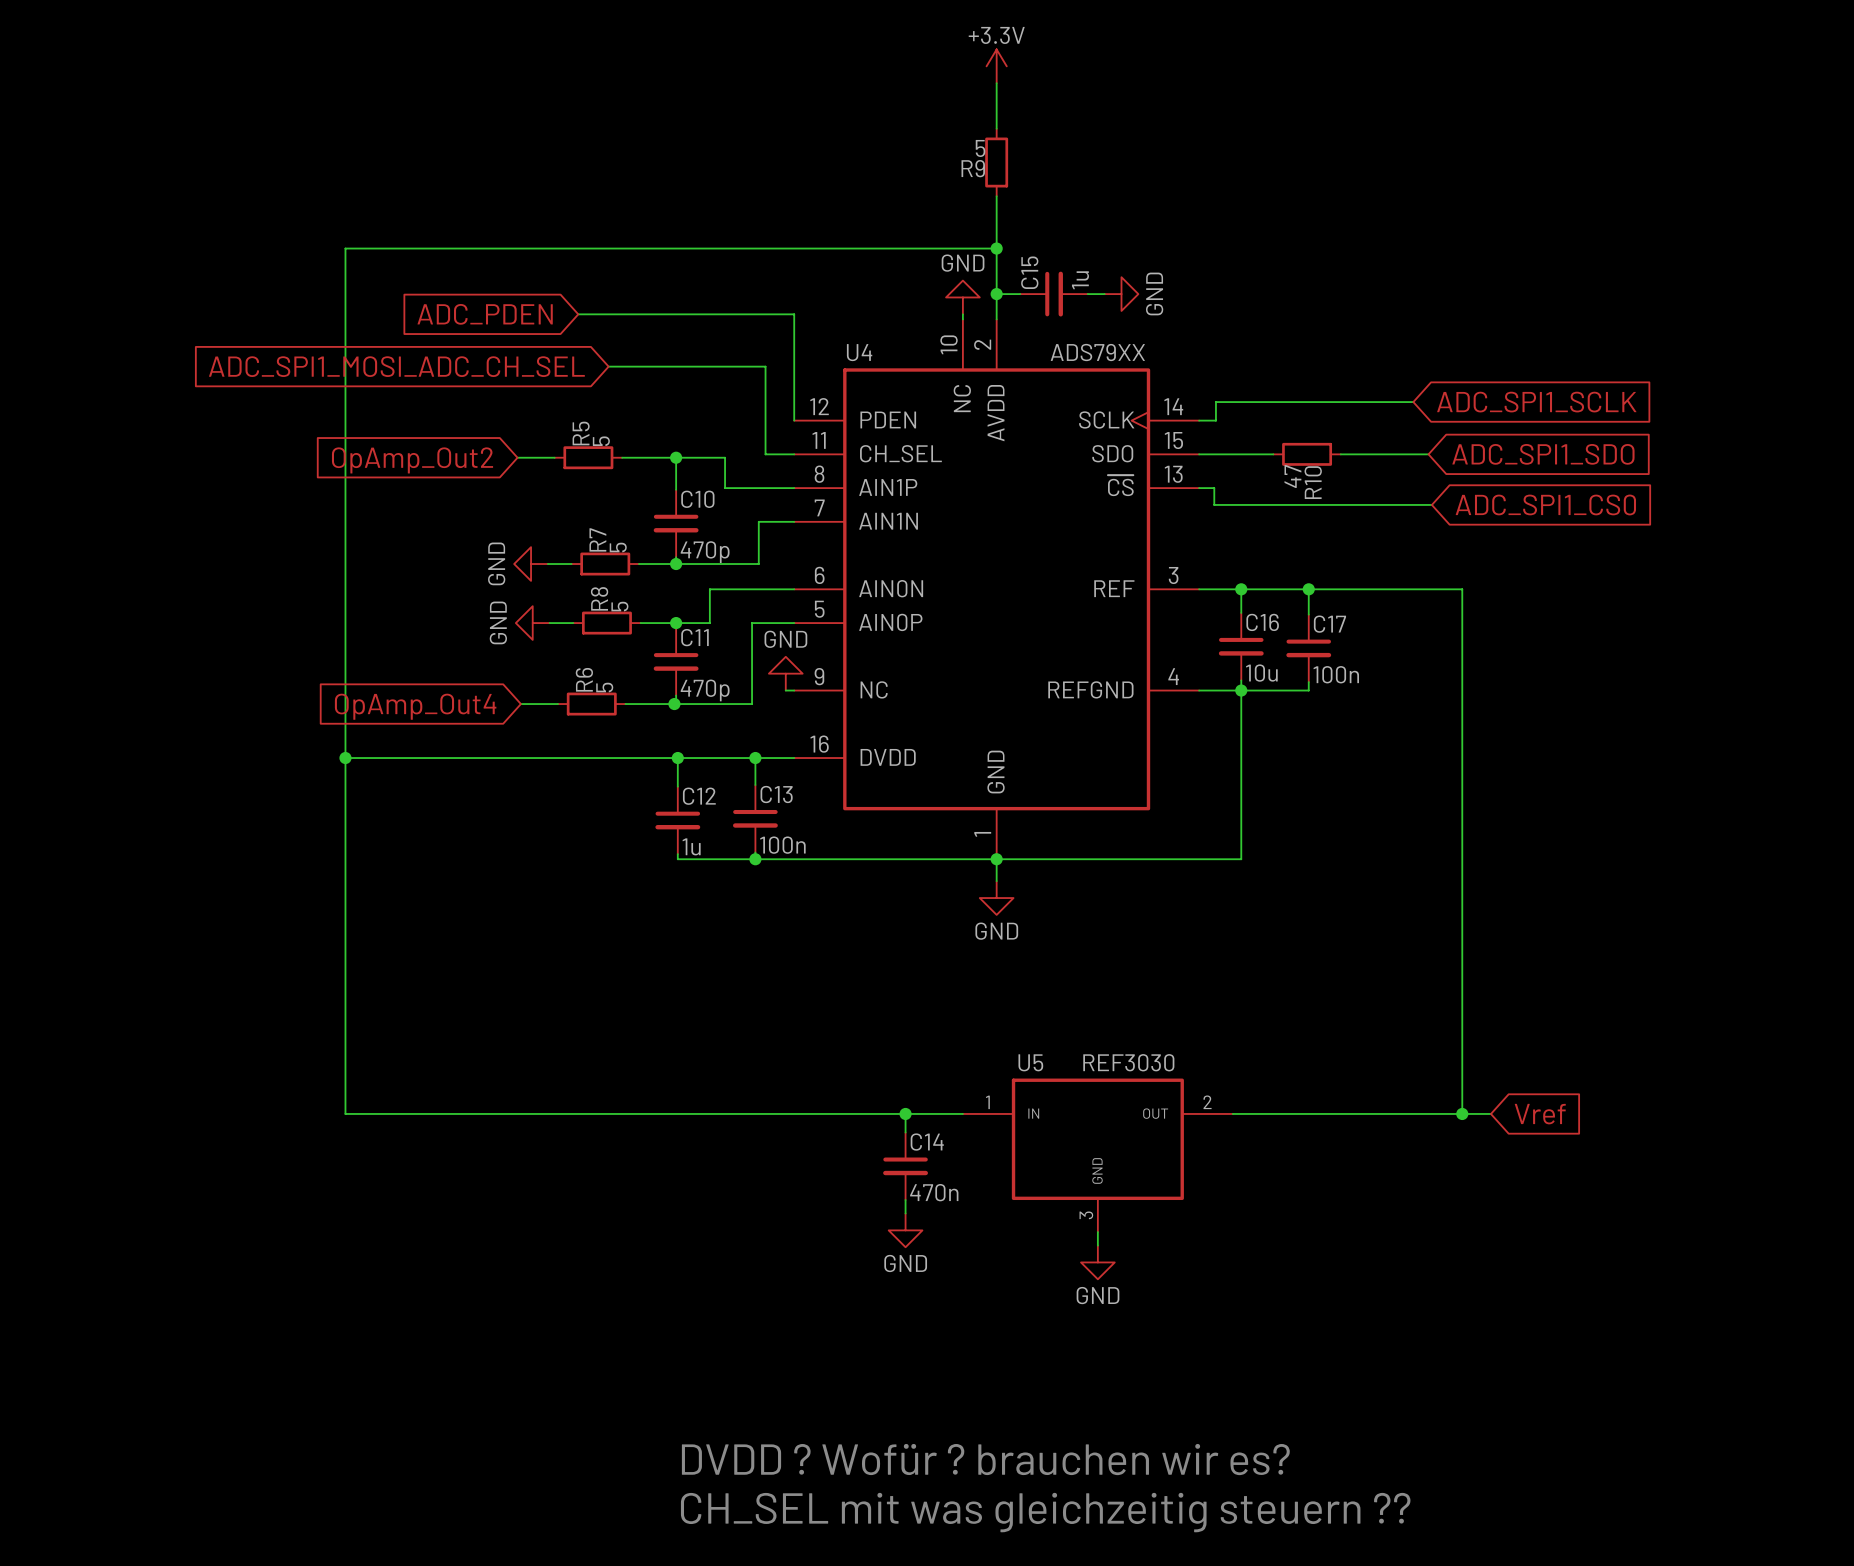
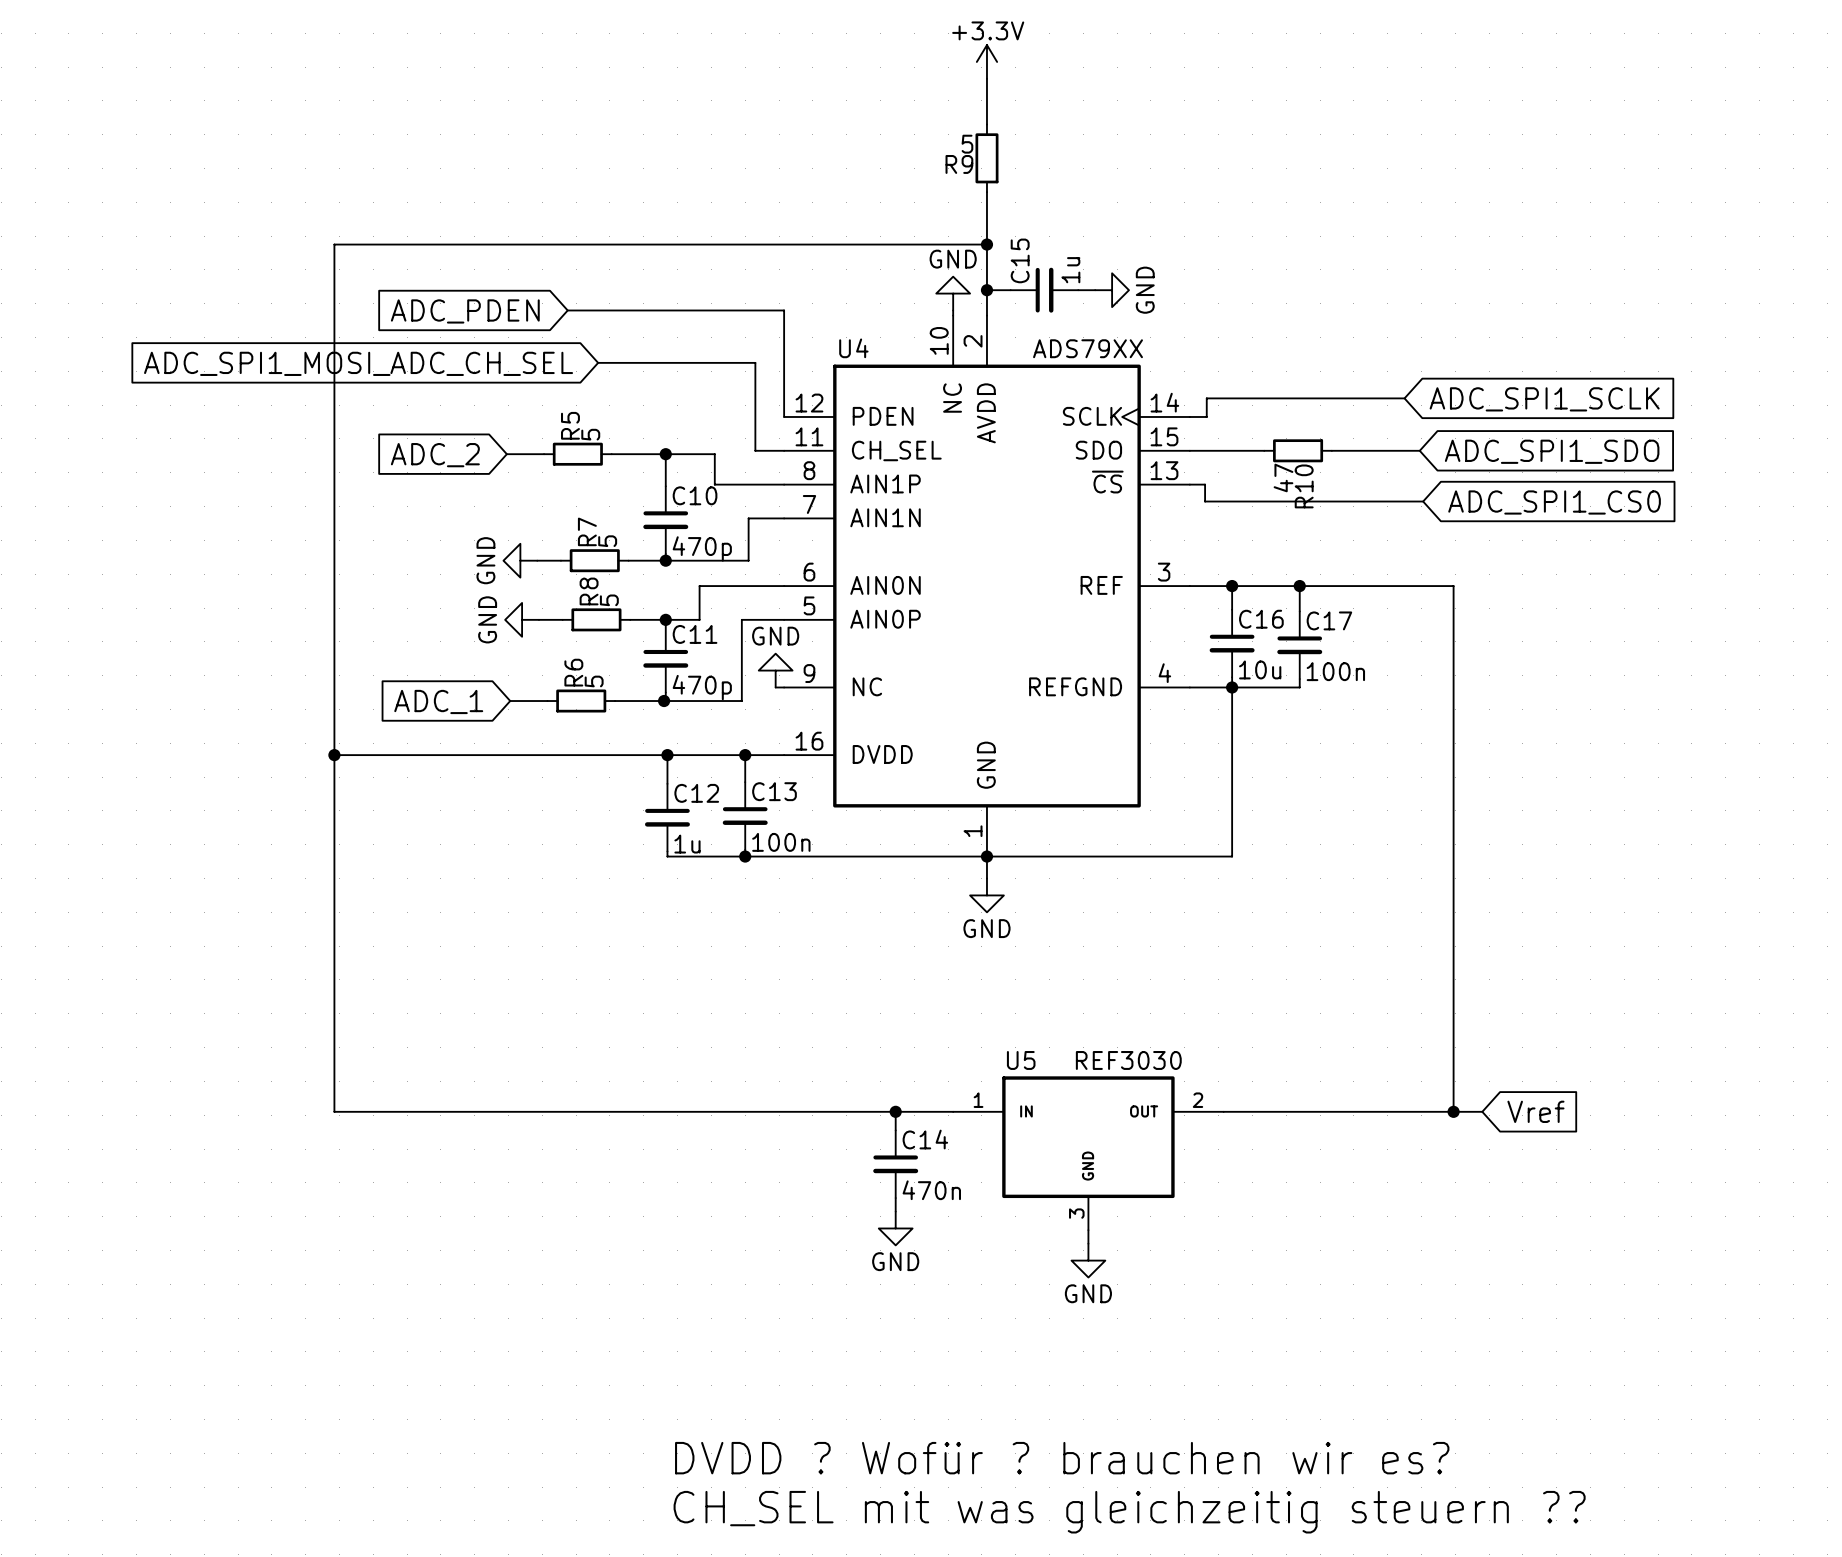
global label: OpAmp_Out2 (412, 460) -> ADC_2 (435, 455)
global label: OpAmp_Out4 (415, 706) -> ADC_1 (438, 701)

